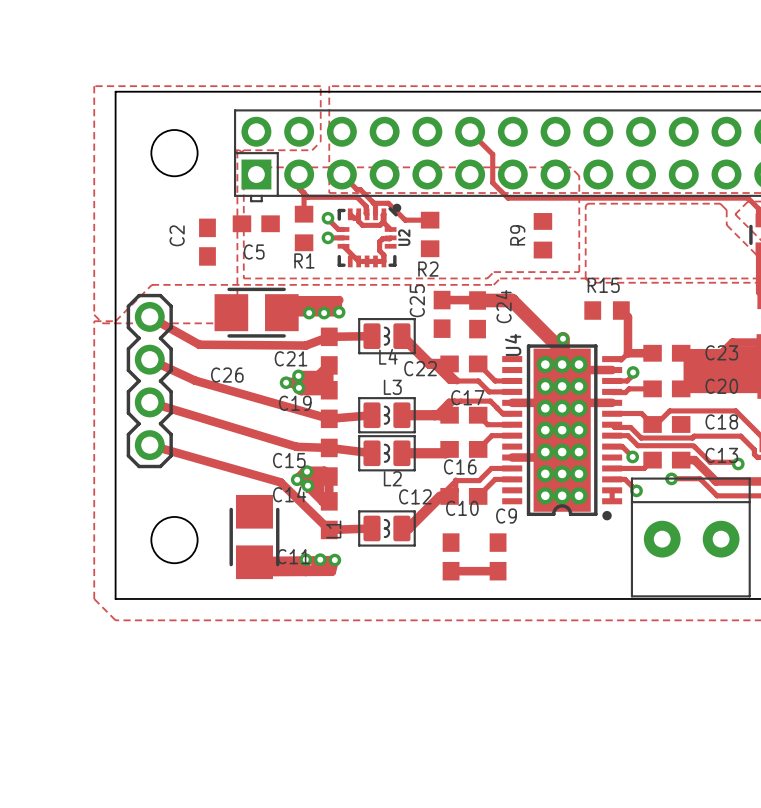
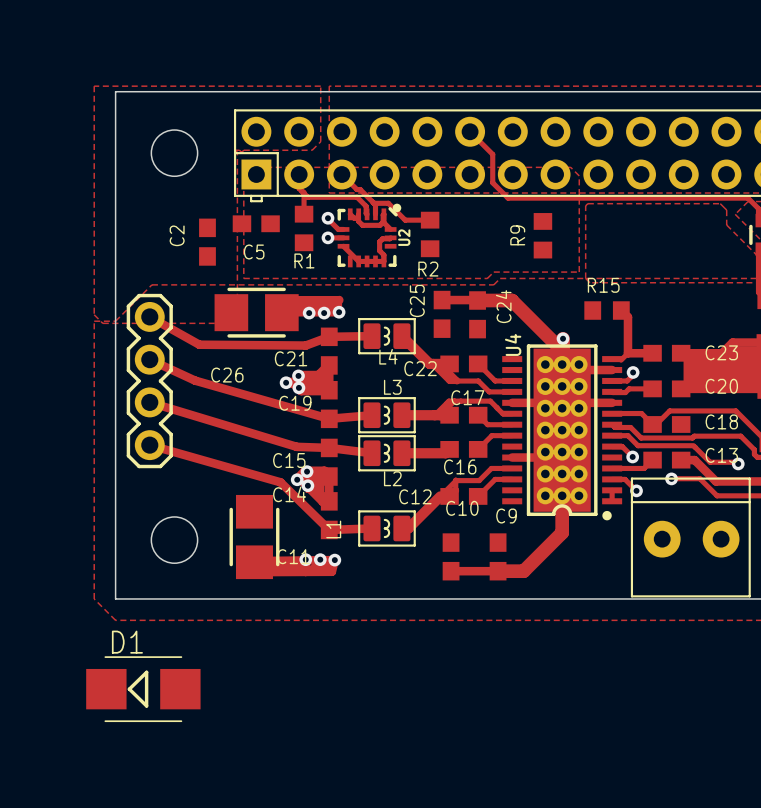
track: none -> (562, 495) (562, 532) (523, 571) (498, 571)
D1: none -> (143, 689)

